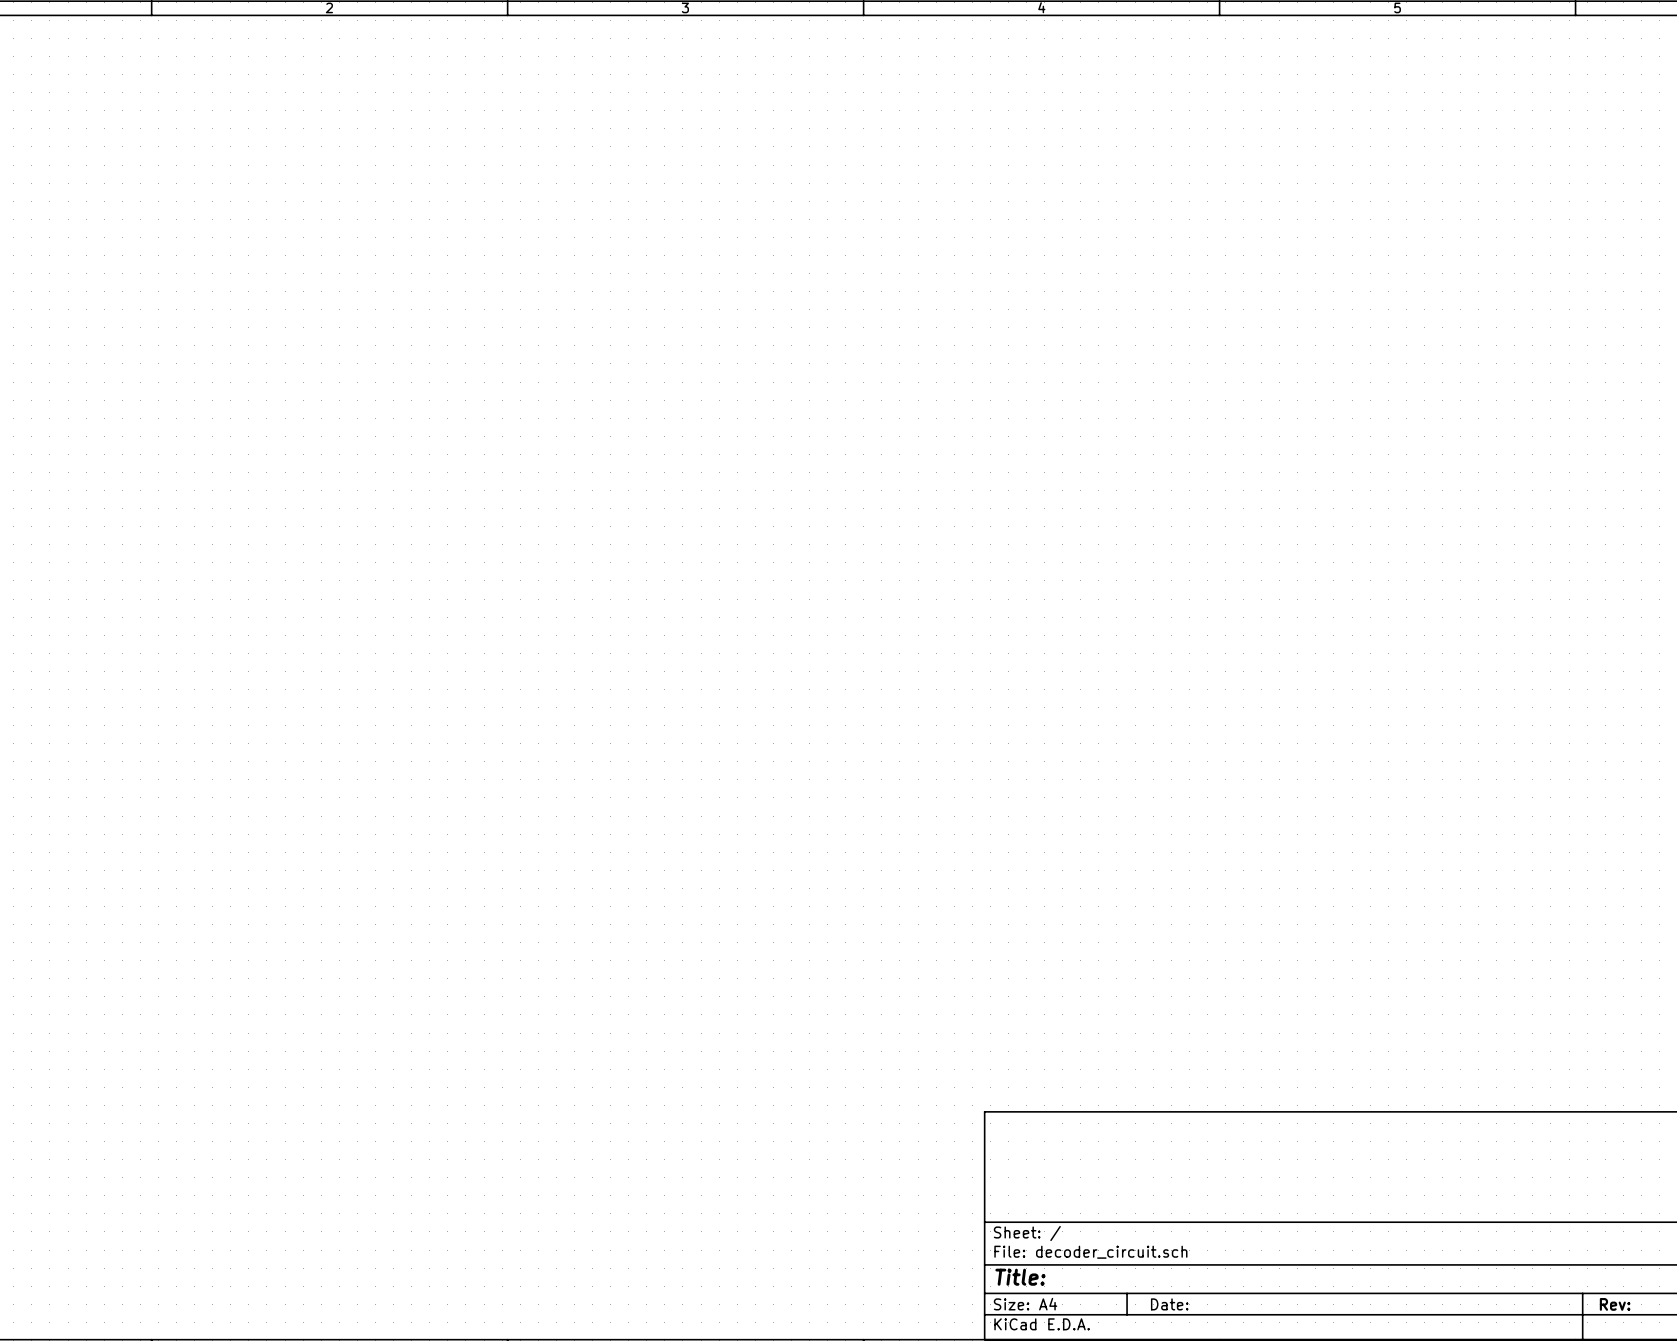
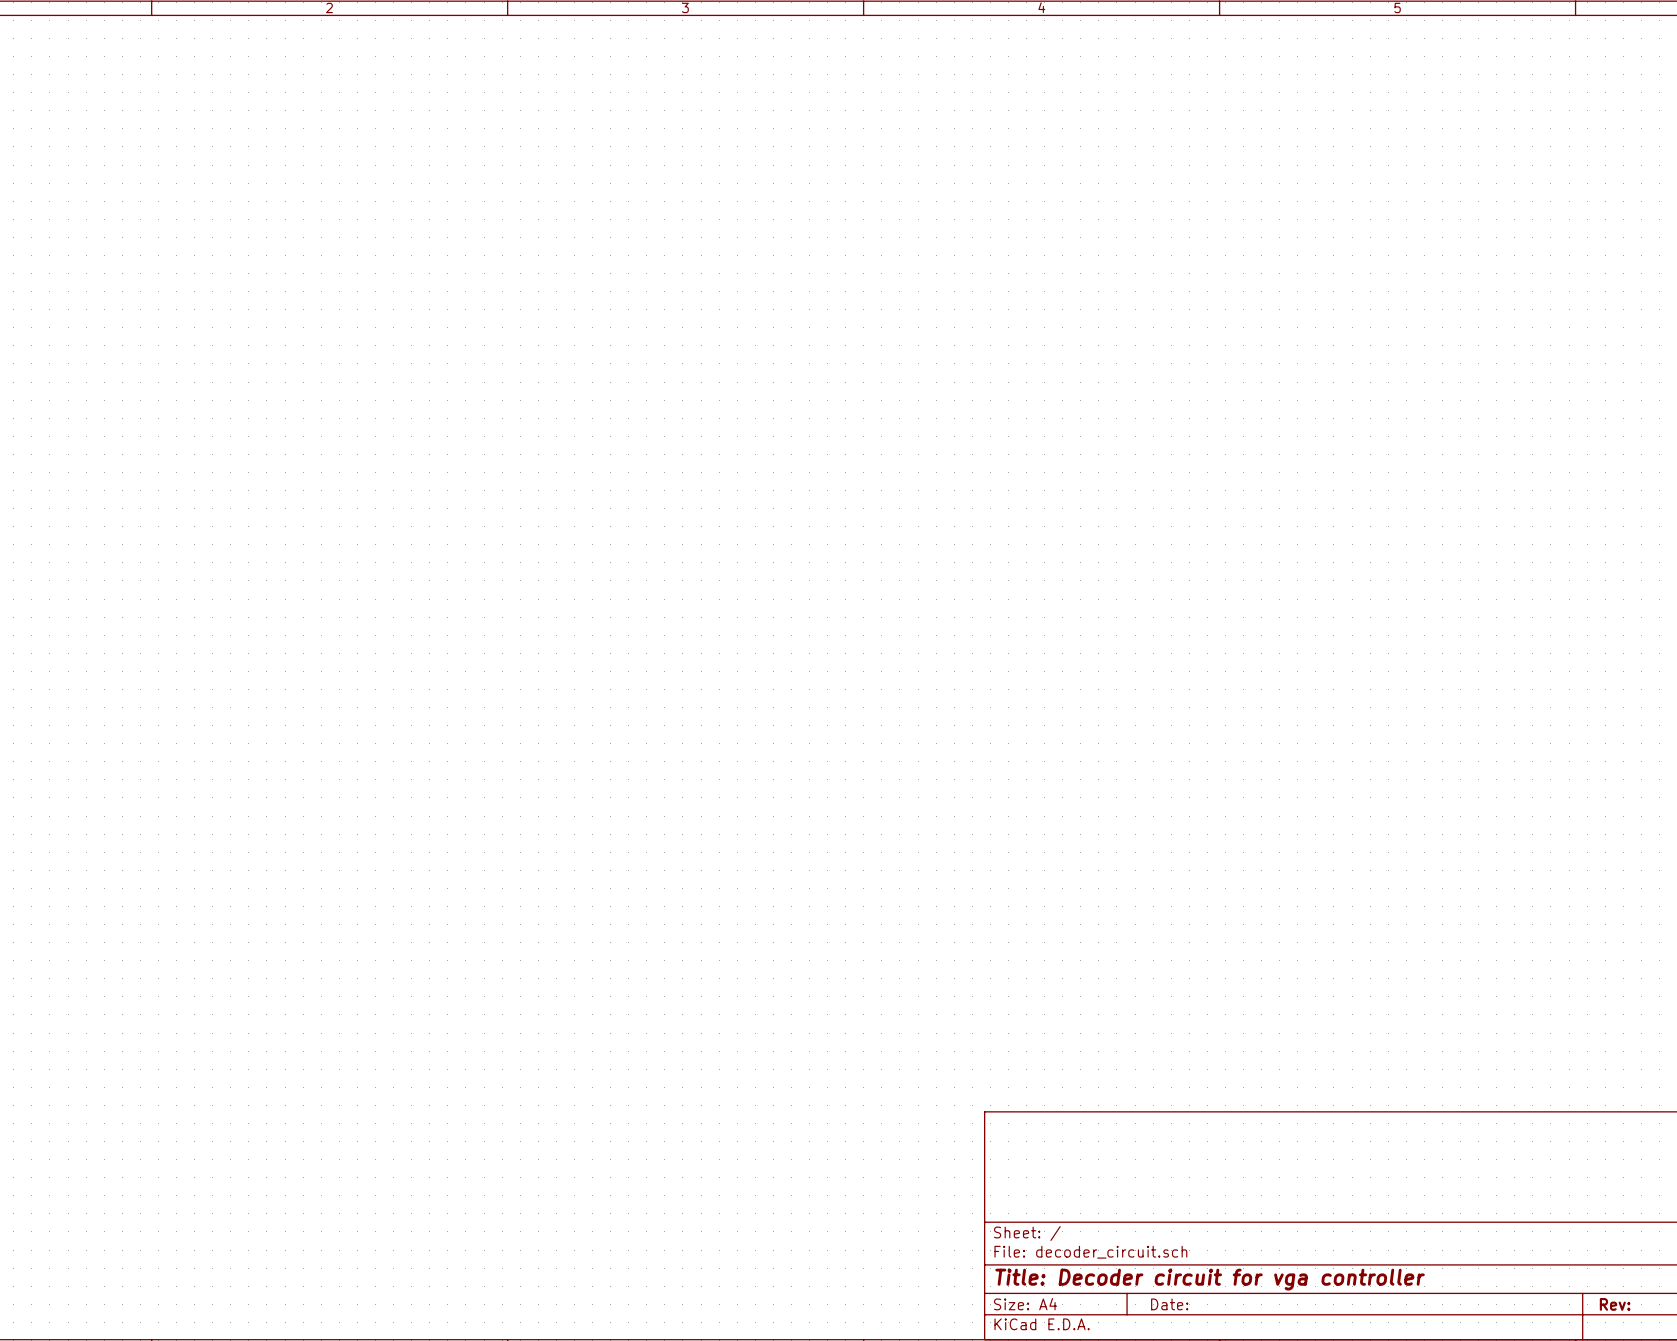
title block: Title: (1020, 1277) -> Title: Decoder circuit for vga controller (1210, 1279)

